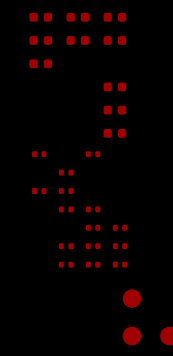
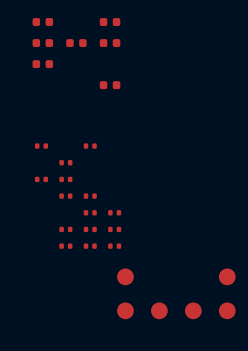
part: (77, 17) -> none
part: (114, 110) -> none
part: (114, 133) -> none

